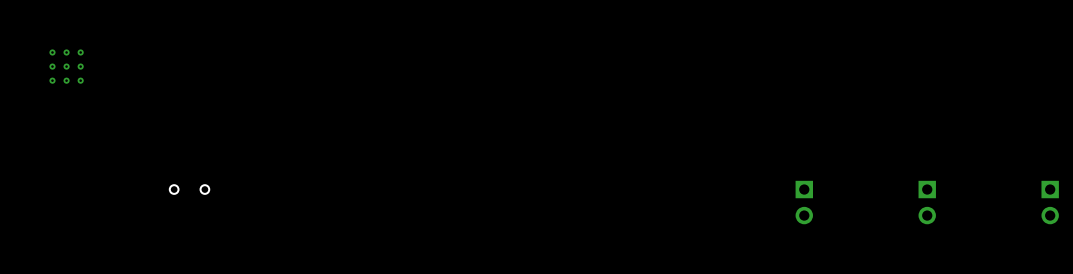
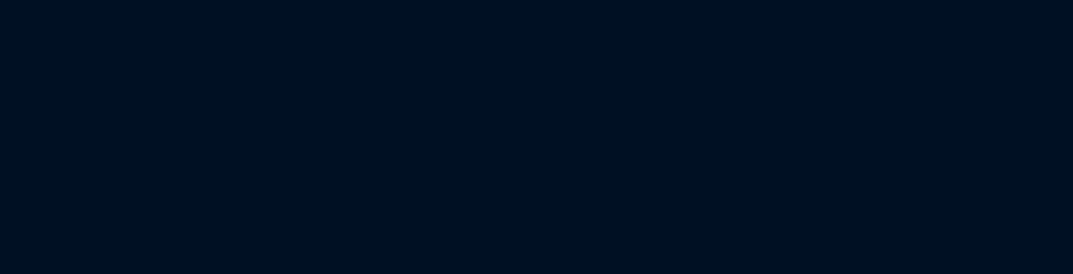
part: (66, 66) -> none
part: (189, 189) -> none
part: (804, 202) -> none
part: (927, 202) -> none
part: (1050, 202) -> none

